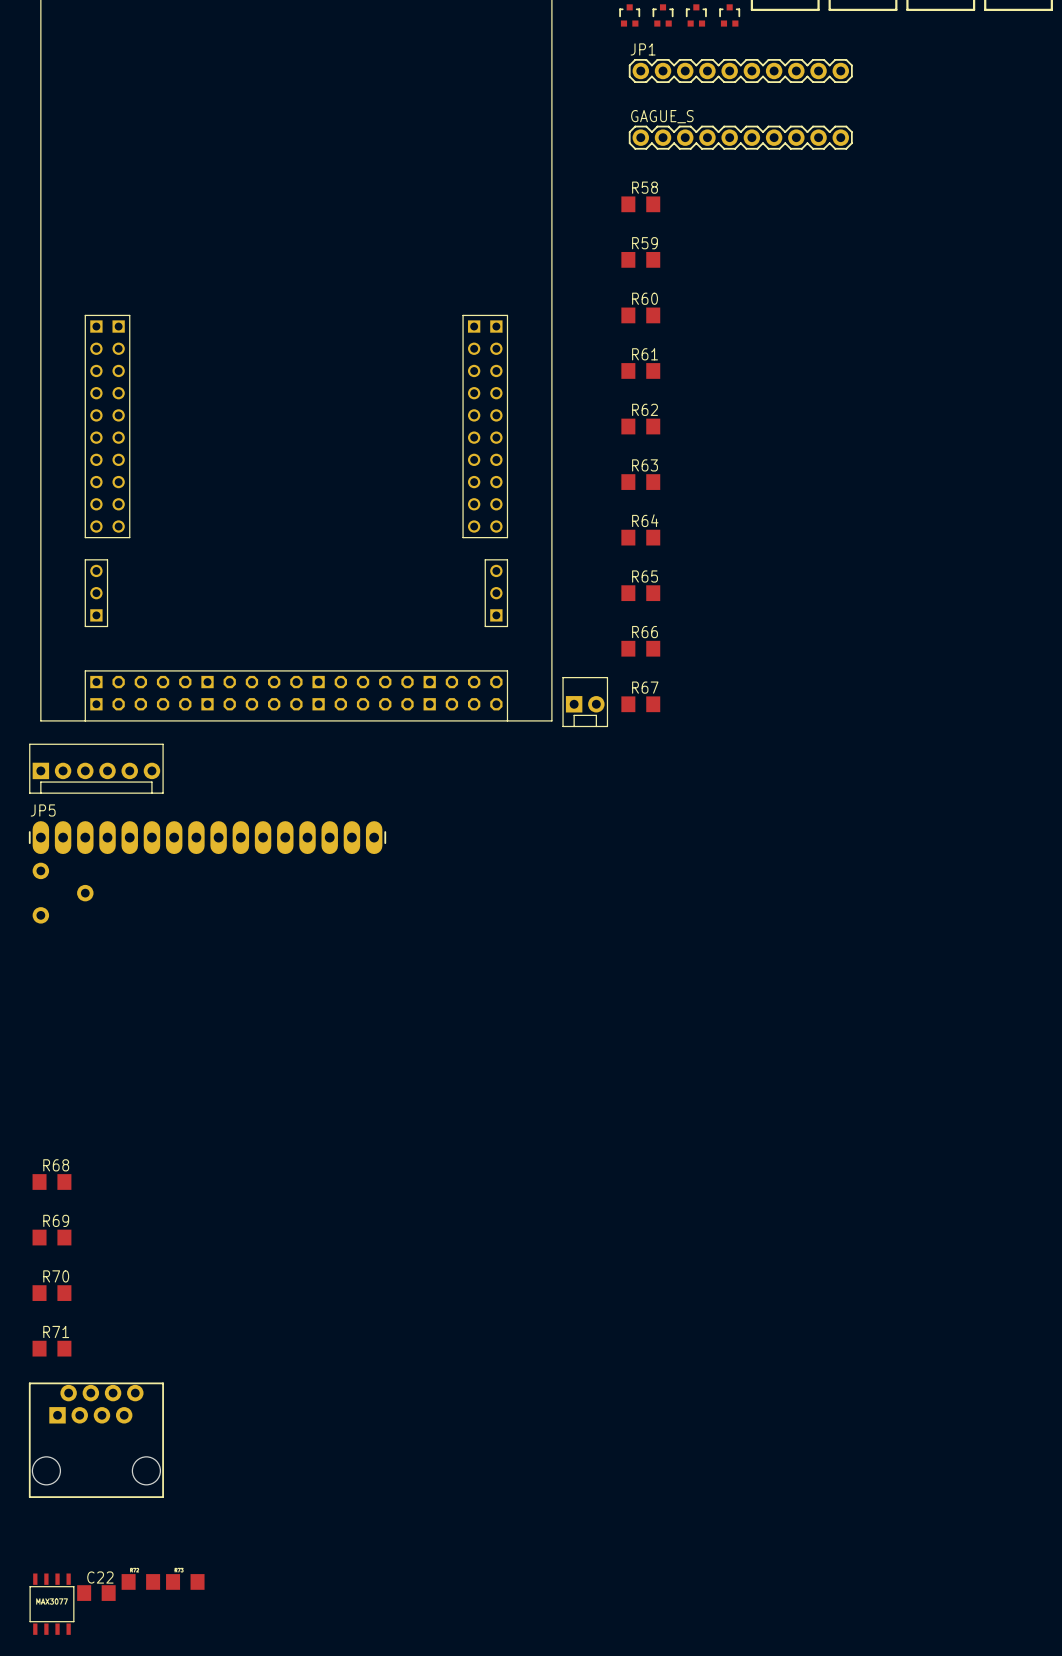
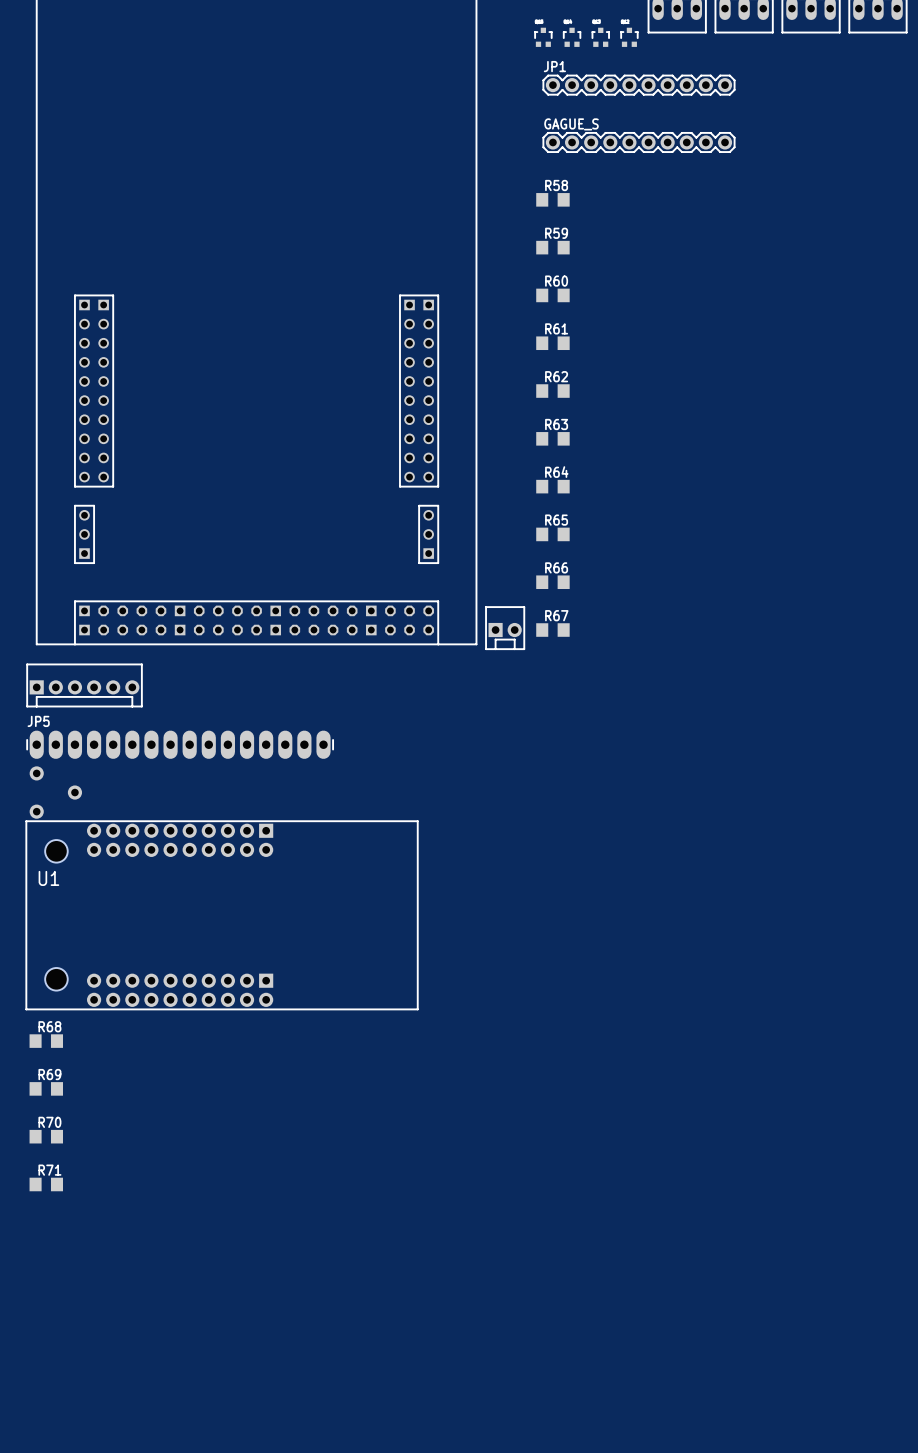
U1: none -> (222, 915)
part: (96, 1440) -> none
part: (140, 1581) -> none
part: (185, 1581) -> none
C22: (96, 1593) -> none
part: (51, 1604) -> none

